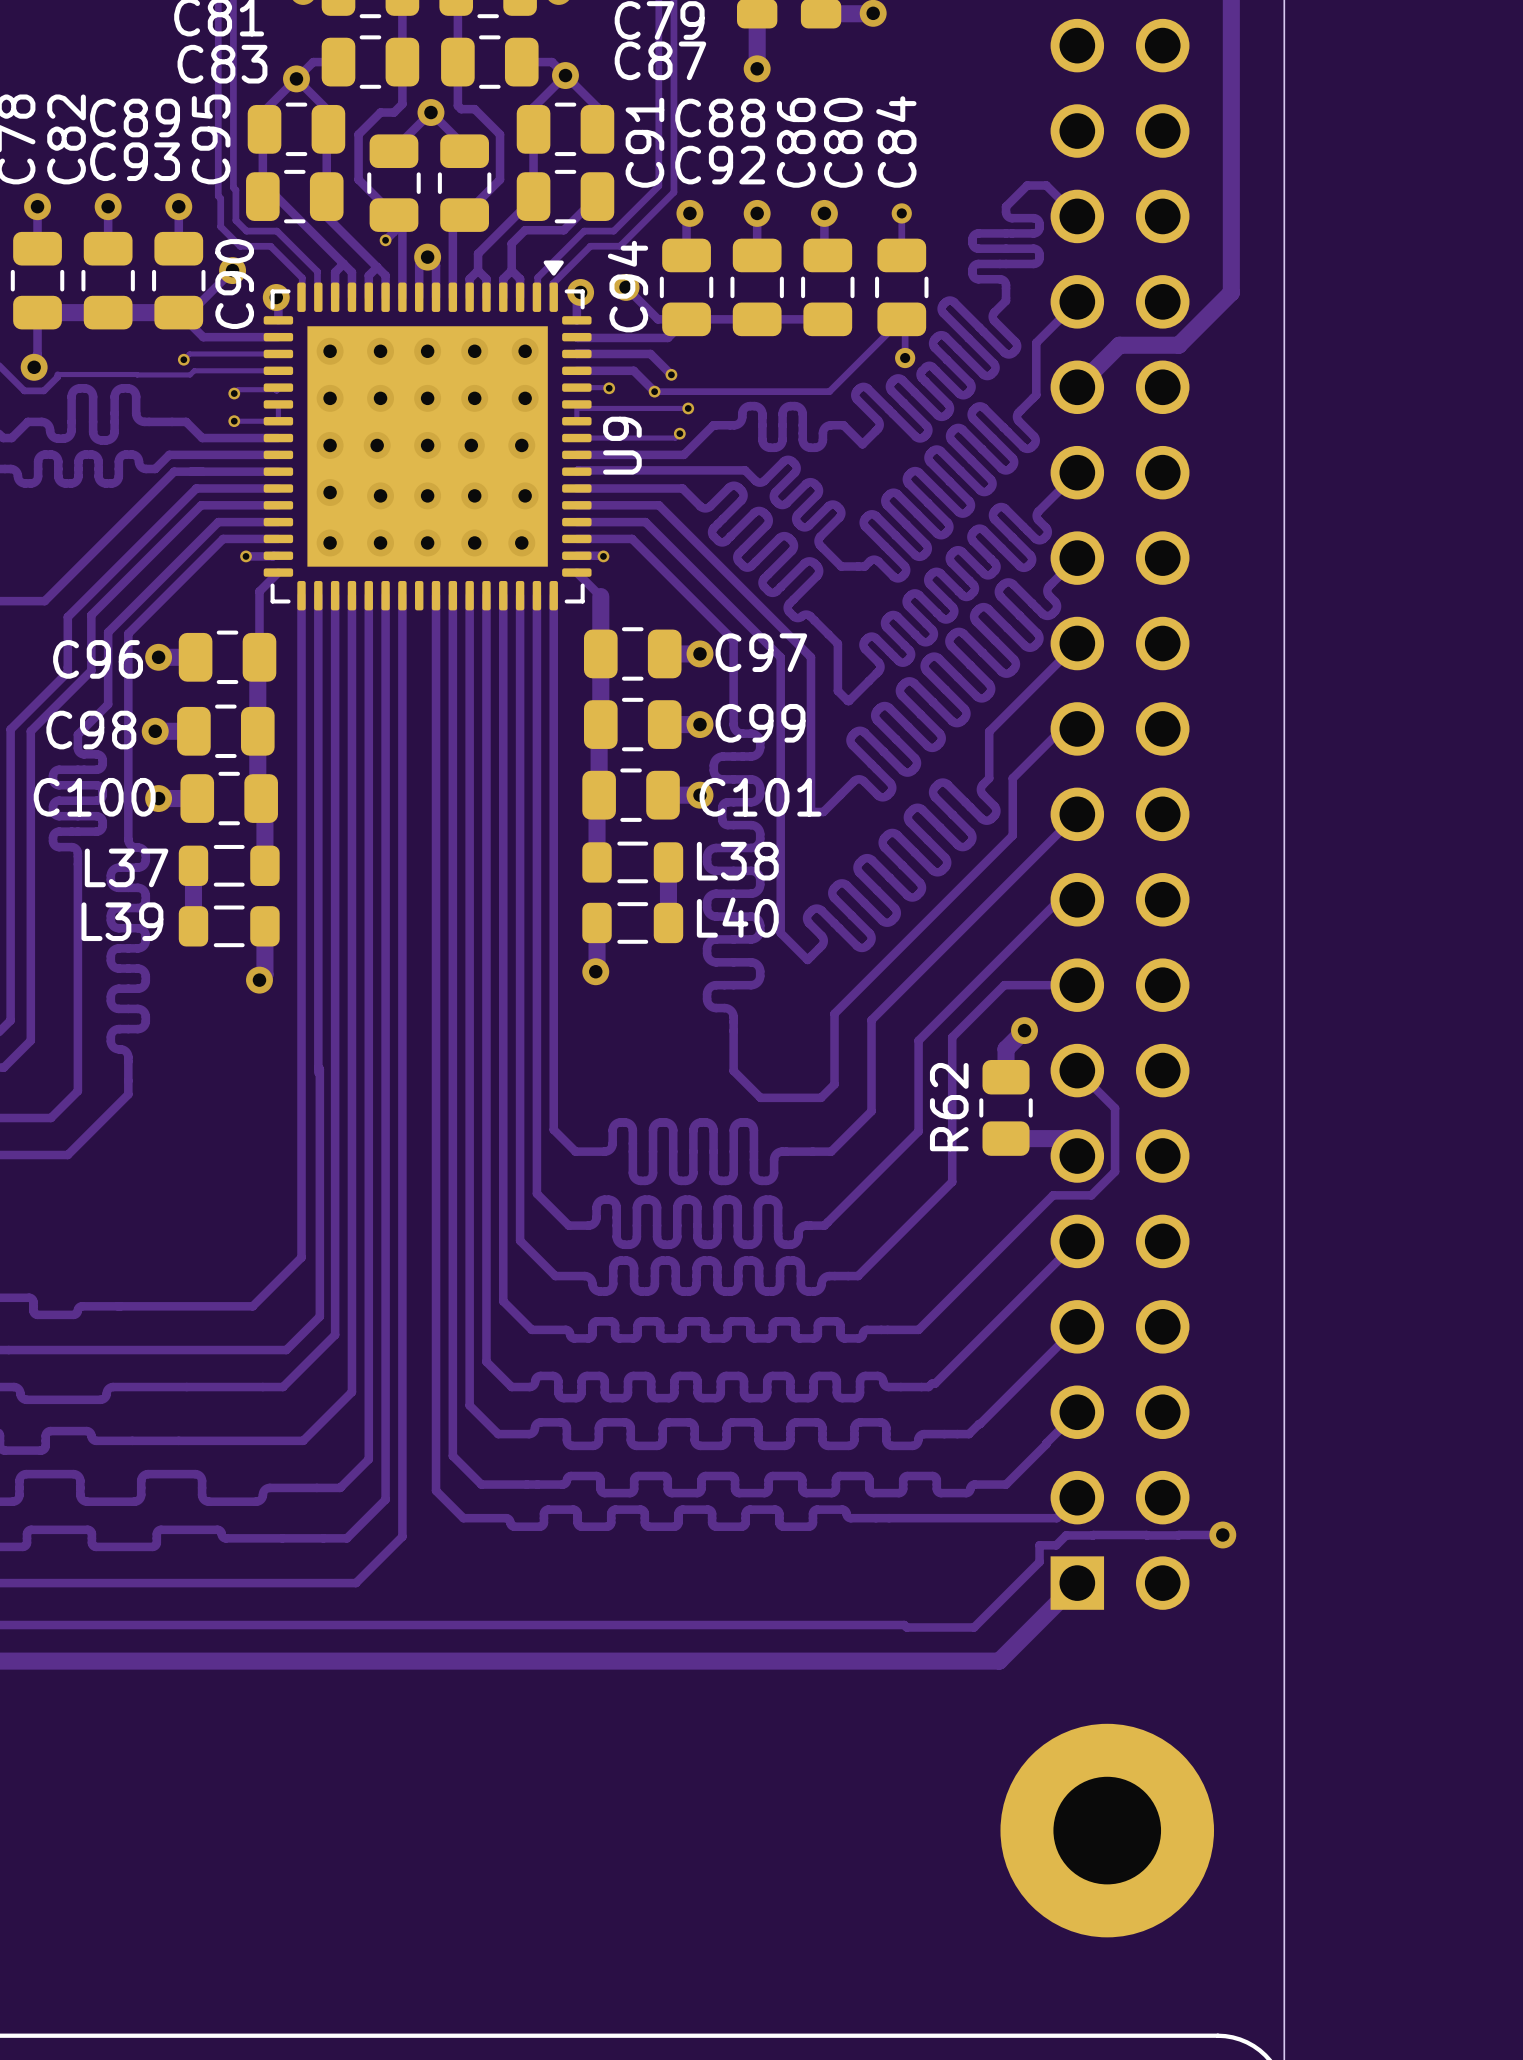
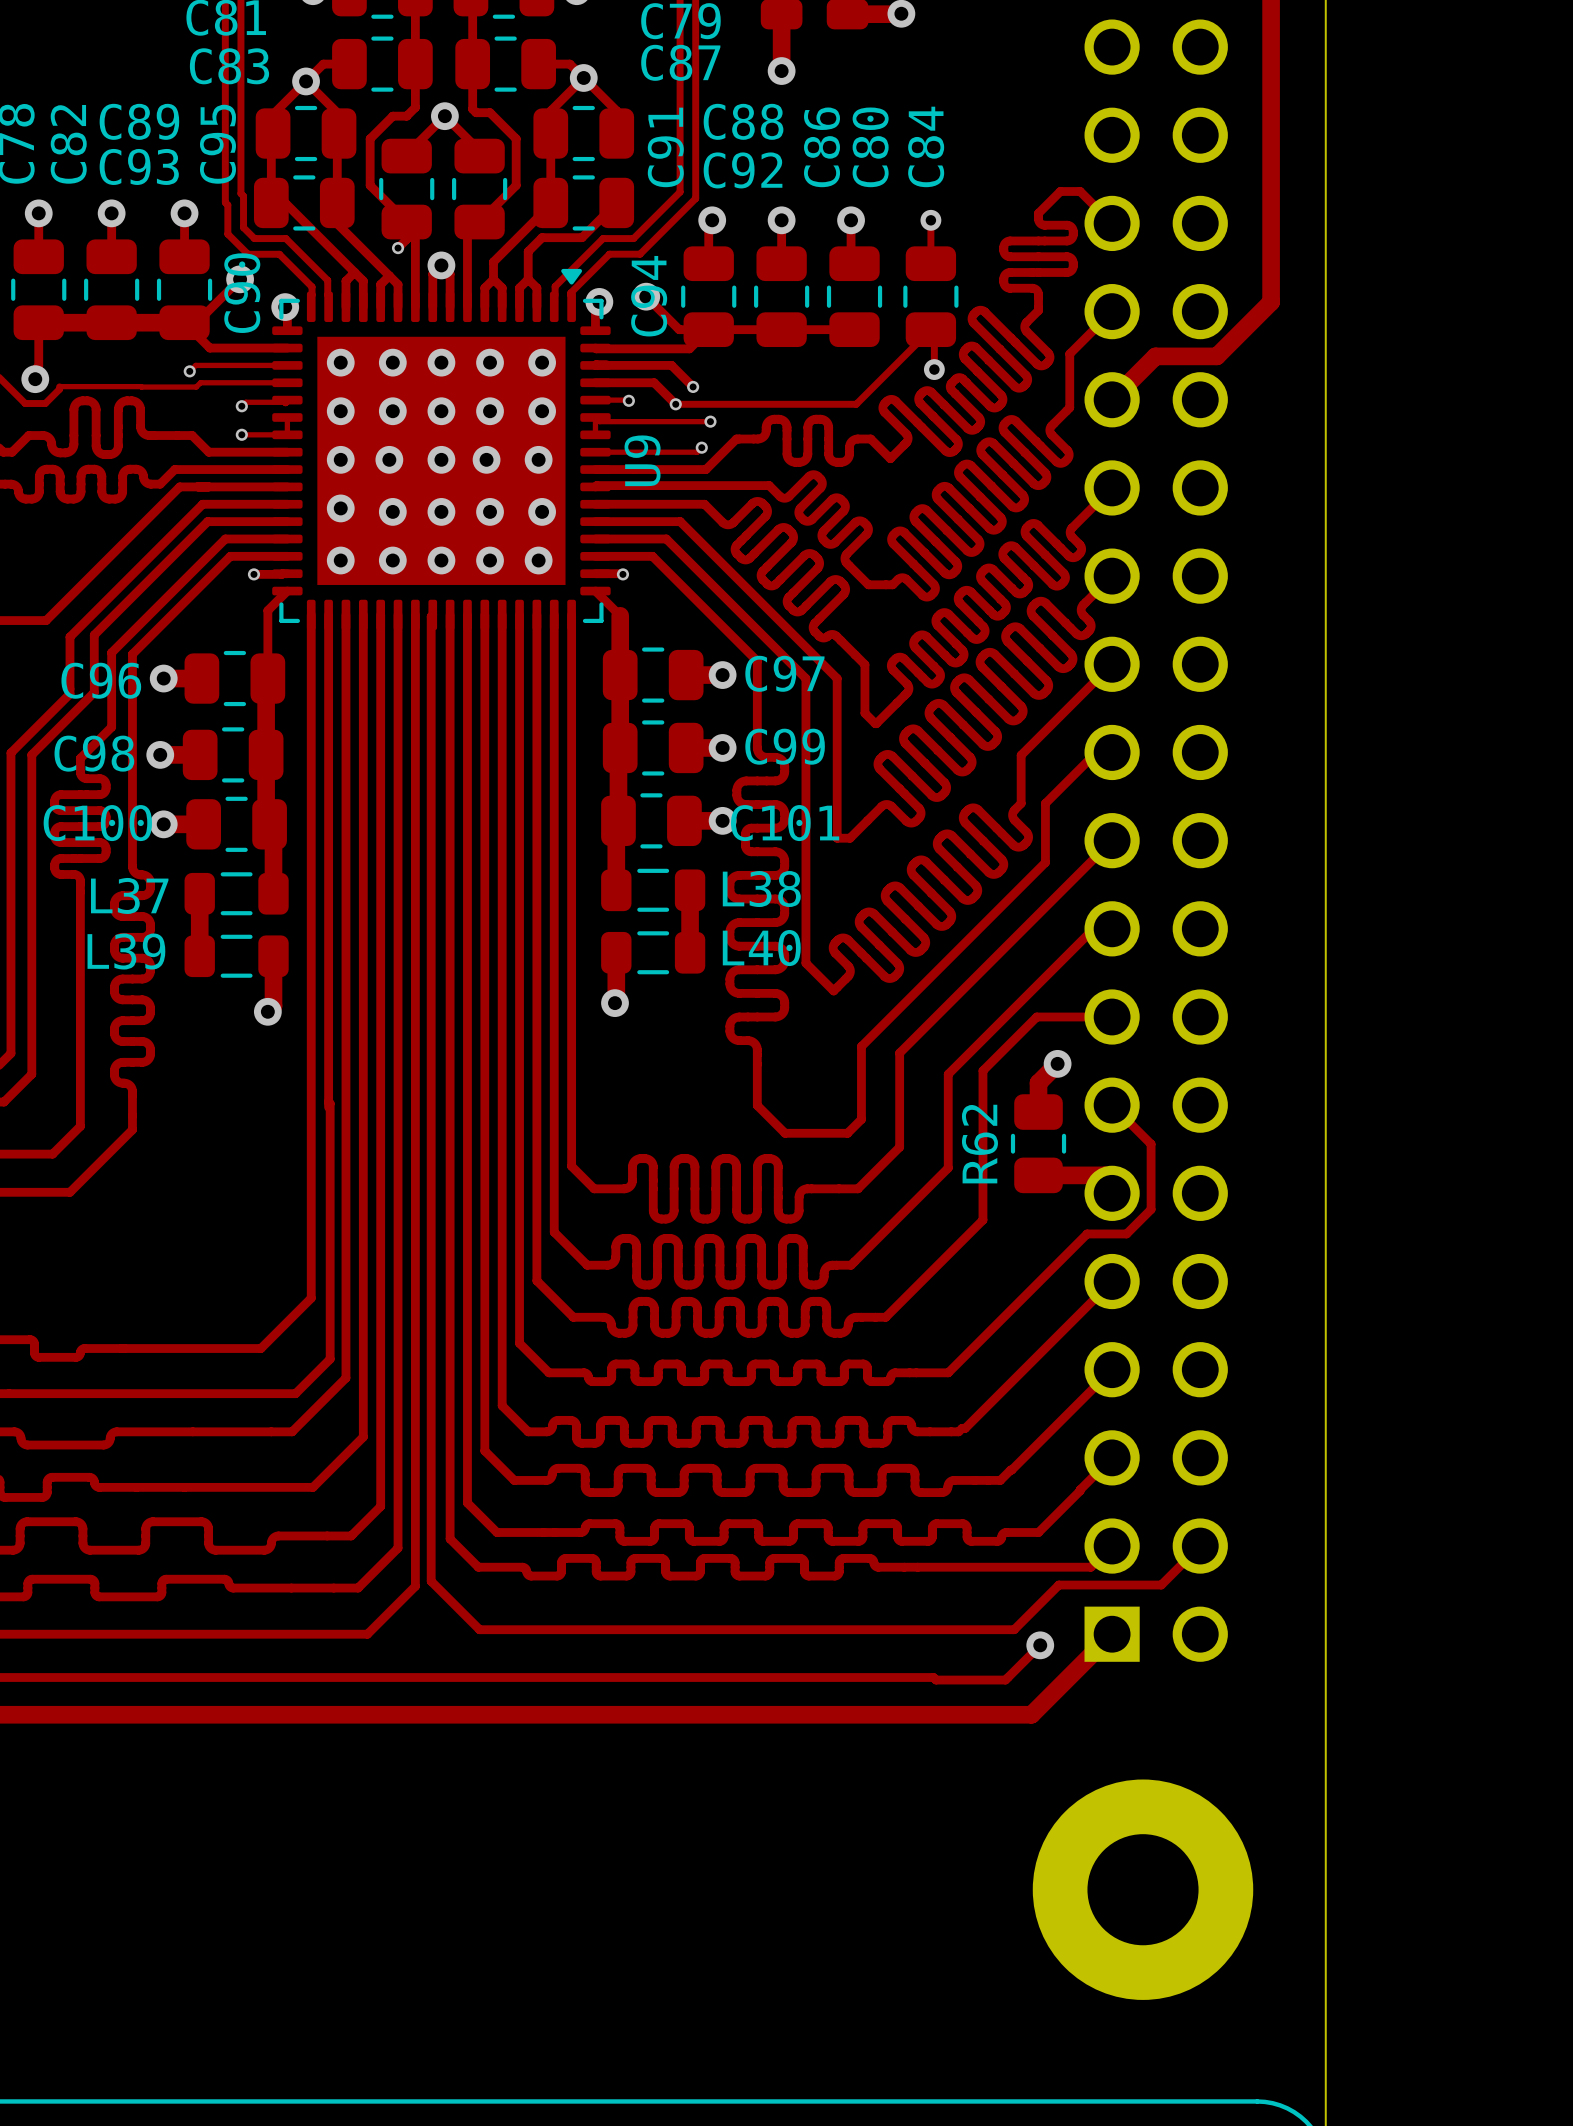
track: (1066, 1535) (1056, 1545) (1039, 1545) (1039, 1562) (1007, 1593) -> (1100, 1585) (1058, 1585) (1014, 1629) (479, 1629) (431, 1581) (431, 616) (432, 614)
track: (1093, 1535) (1146, 1535) -> (1128, 1585) (1161, 1585) (1200, 1546)
track: (1147, 1535) (1178, 1535) -> none
track: (1178, 1535) (1222, 1535) -> none
via: (1222, 1535) -> none
via: none -> (1040, 1645)

